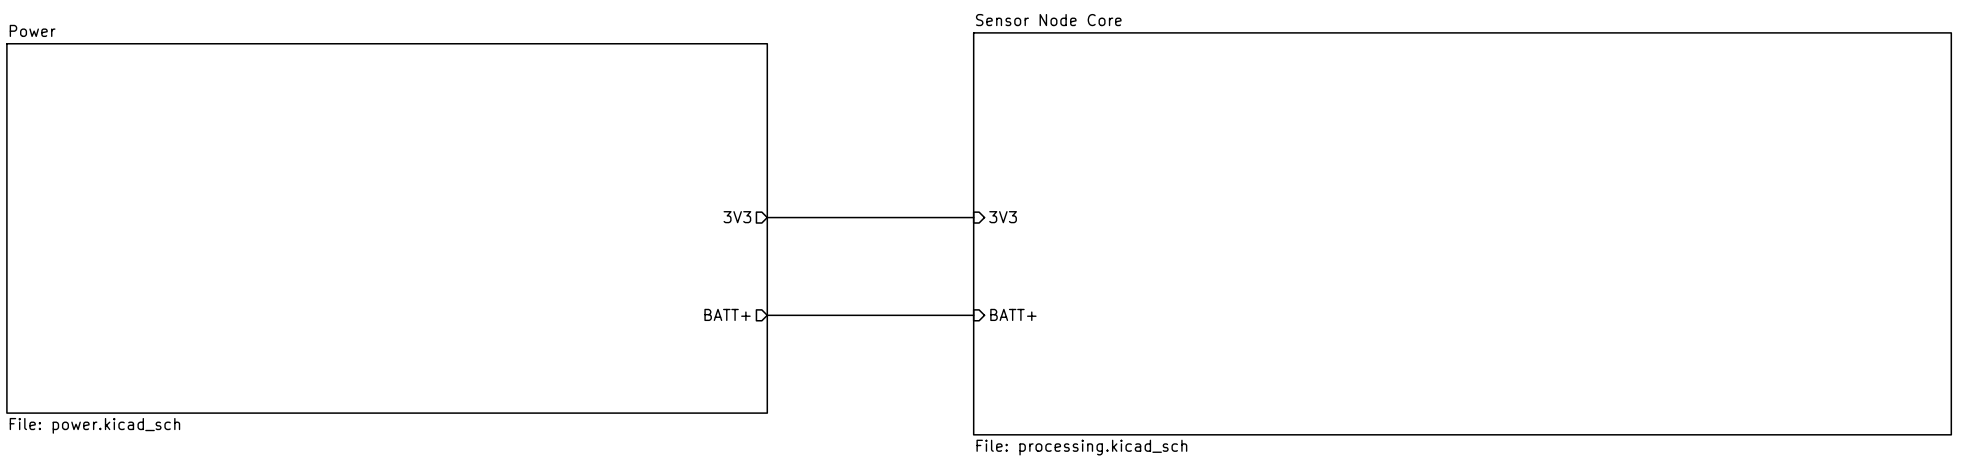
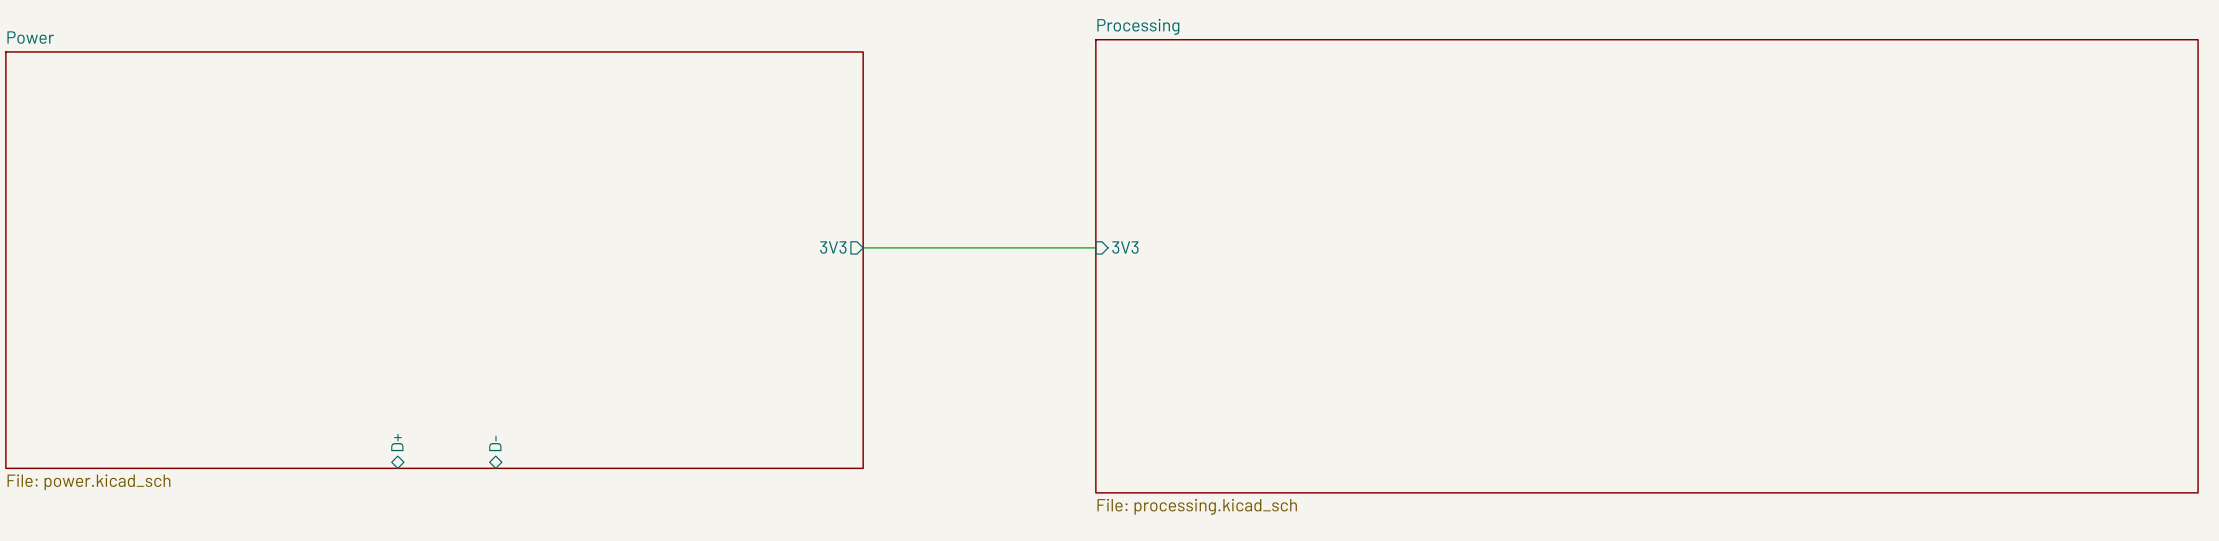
sheet Sensor Node Core name: Sensor Node Core (1048, 20) -> Processing (1138, 26)
sheet pin: BATT+ (727, 314) -> none
sheet pin: BATT+ (1013, 314) -> none
wire: (767, 315) (973, 315) -> none
sheet pin: none -> D+ (397, 442)
sheet pin: none -> D- (495, 443)

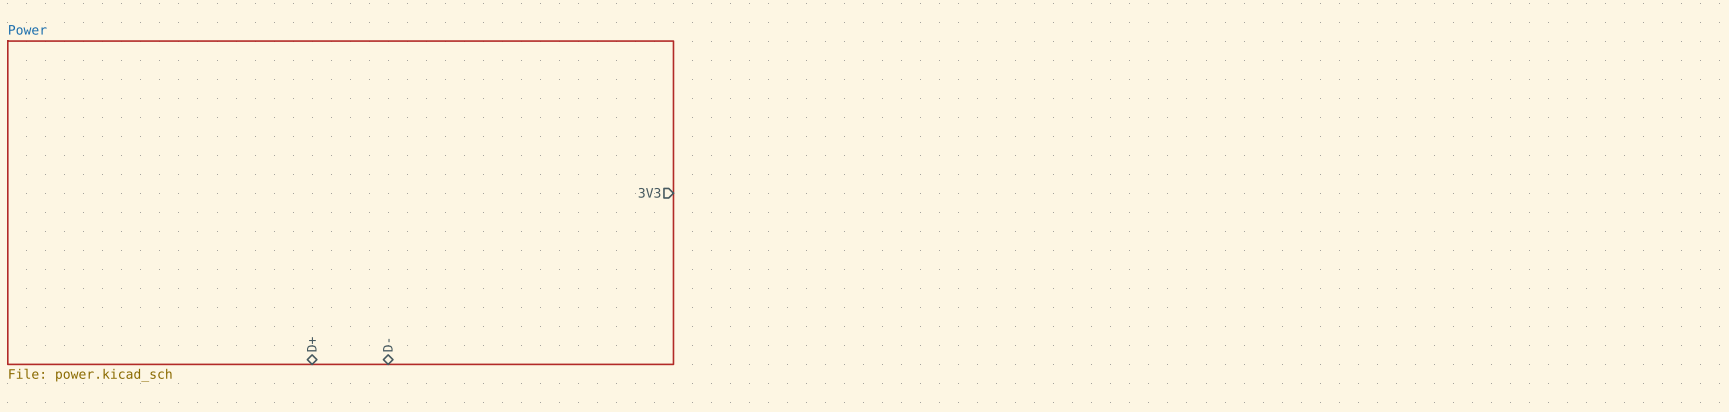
wire: (863, 247) (1095, 247) -> none
sheet pin: 3V3 (1125, 247) -> none
sheet Processing: File: processing.kicad_sch (1646, 266) -> none

